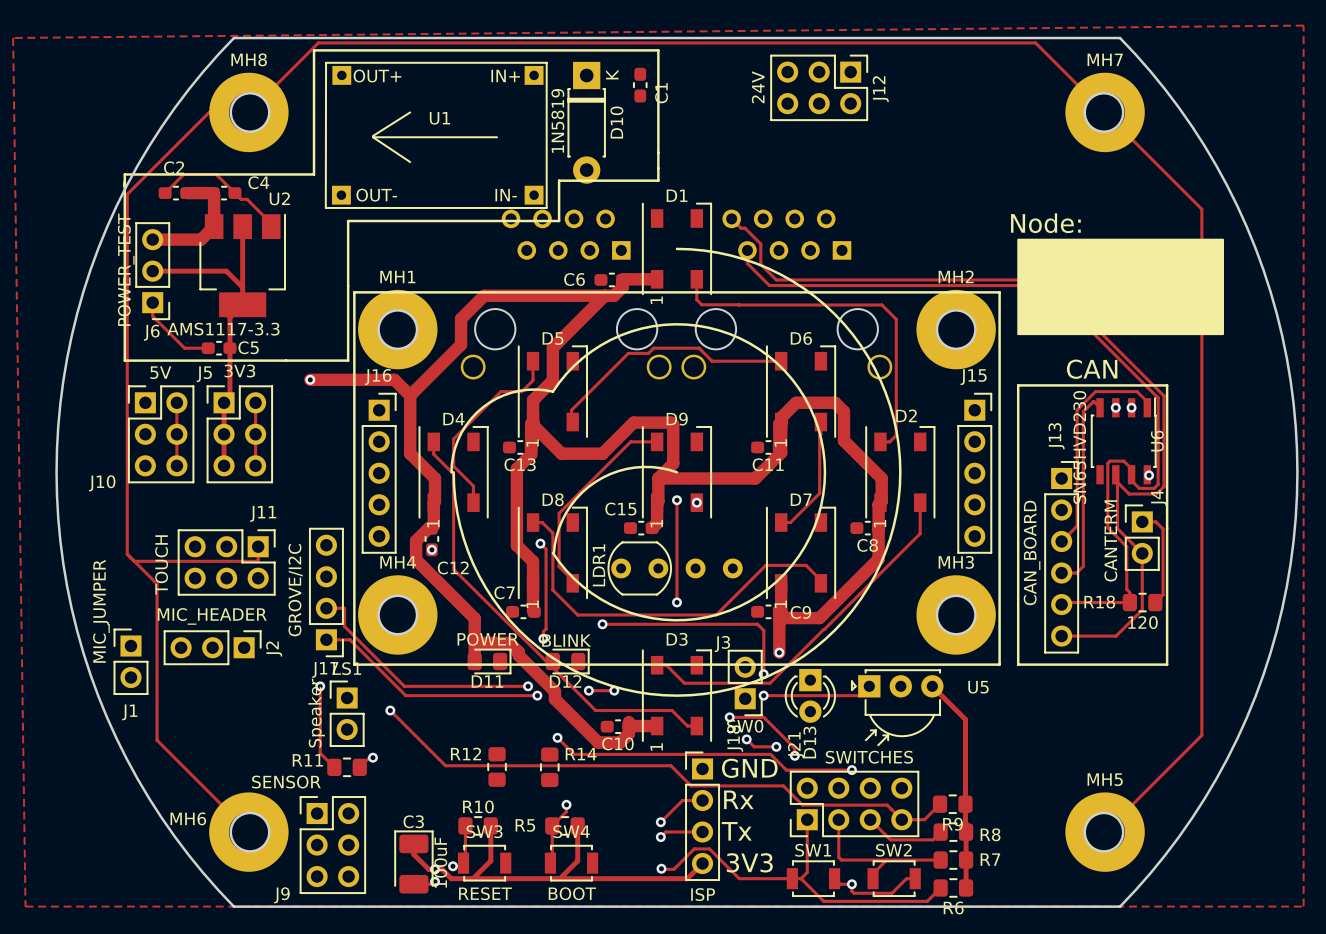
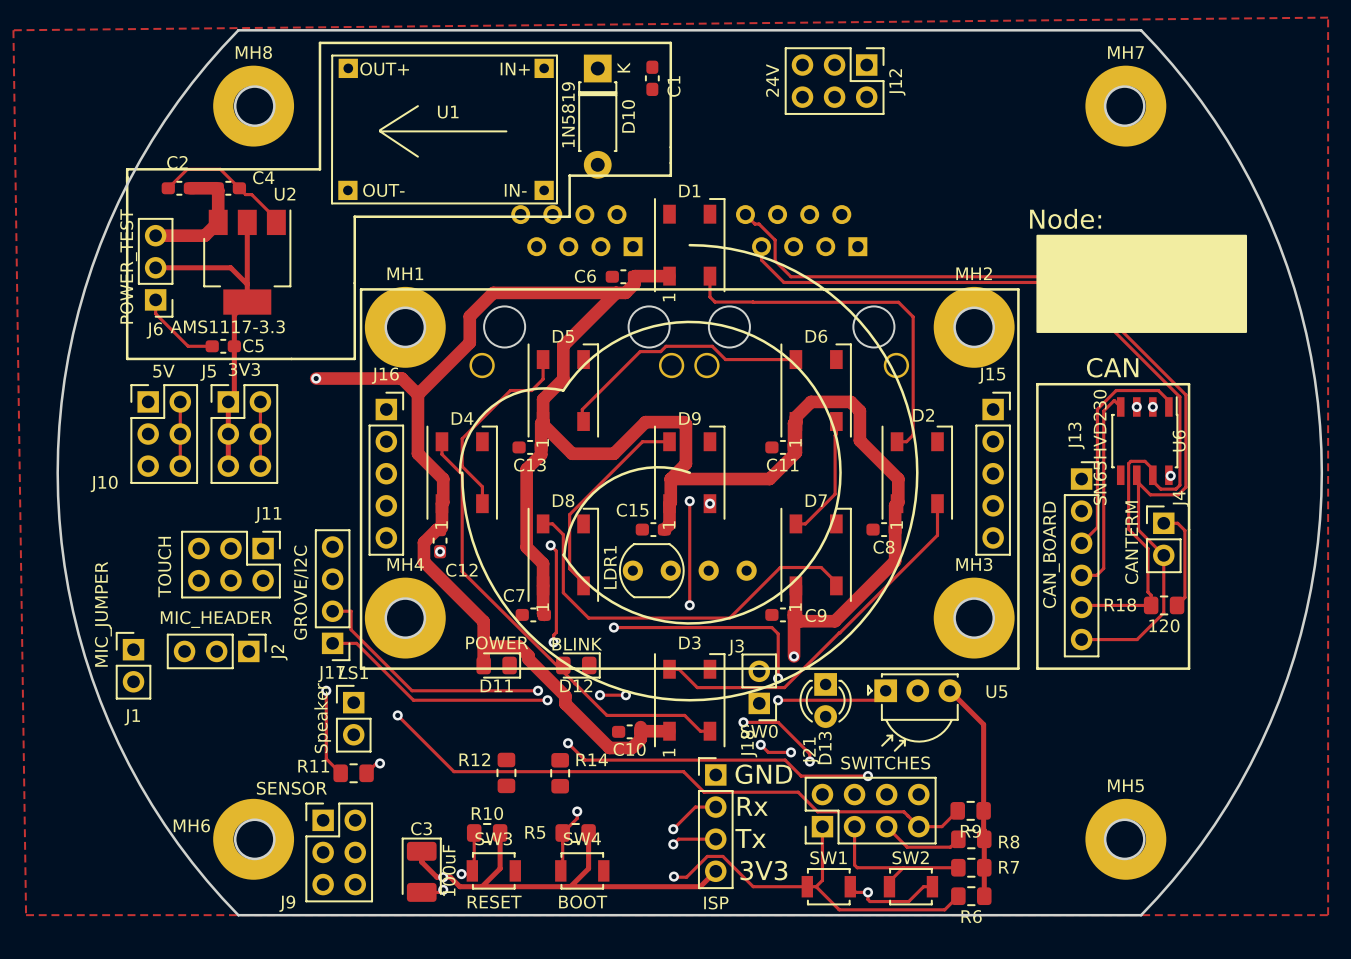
track: (258, 546) (257, 561) (134, 561) -> none
track: (248, 832) (157, 740) (157, 583) (127, 554) (127, 194) (209, 112) (248, 112) (318, 42) (1035, 42) (1201, 209) (1201, 735) (1105, 832) -> none

